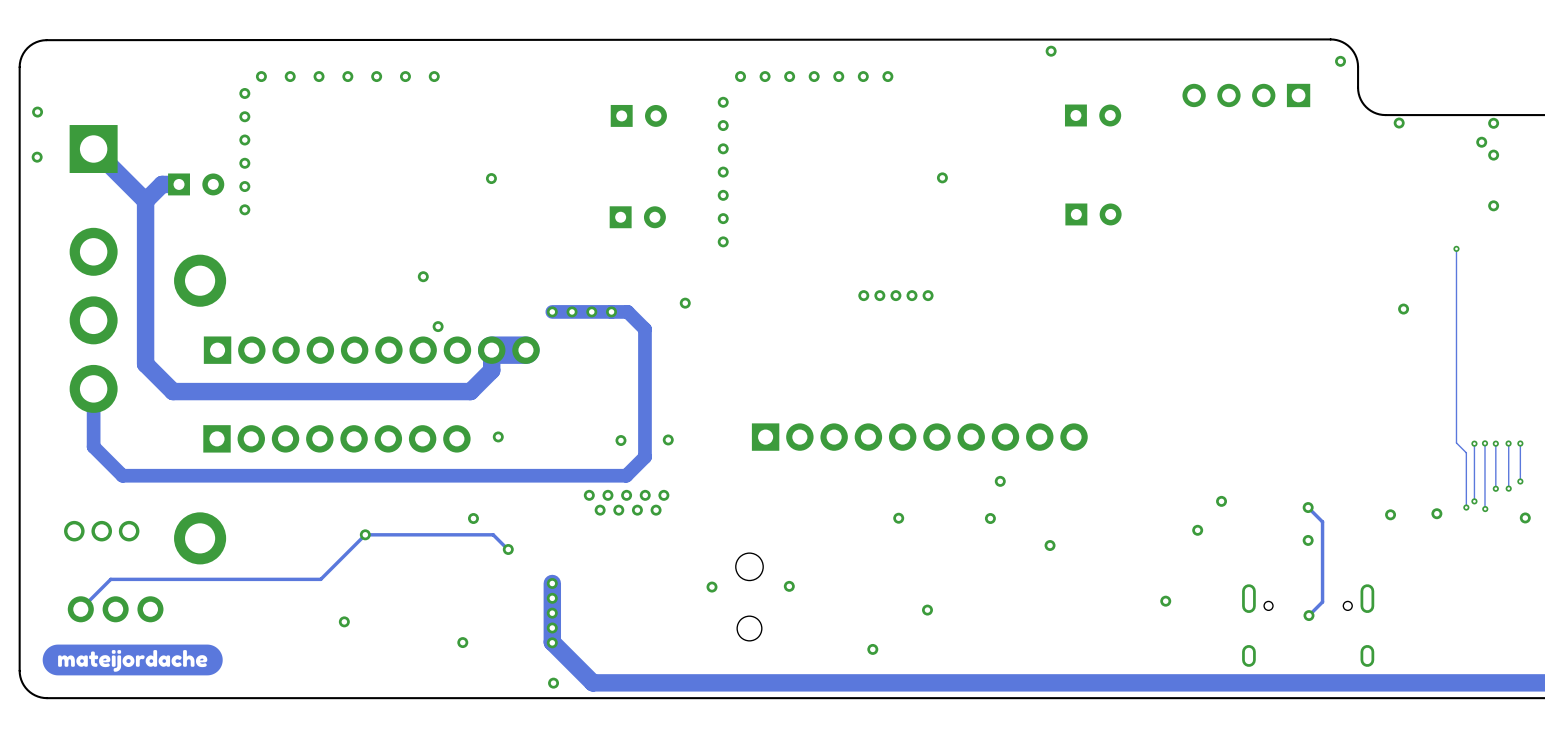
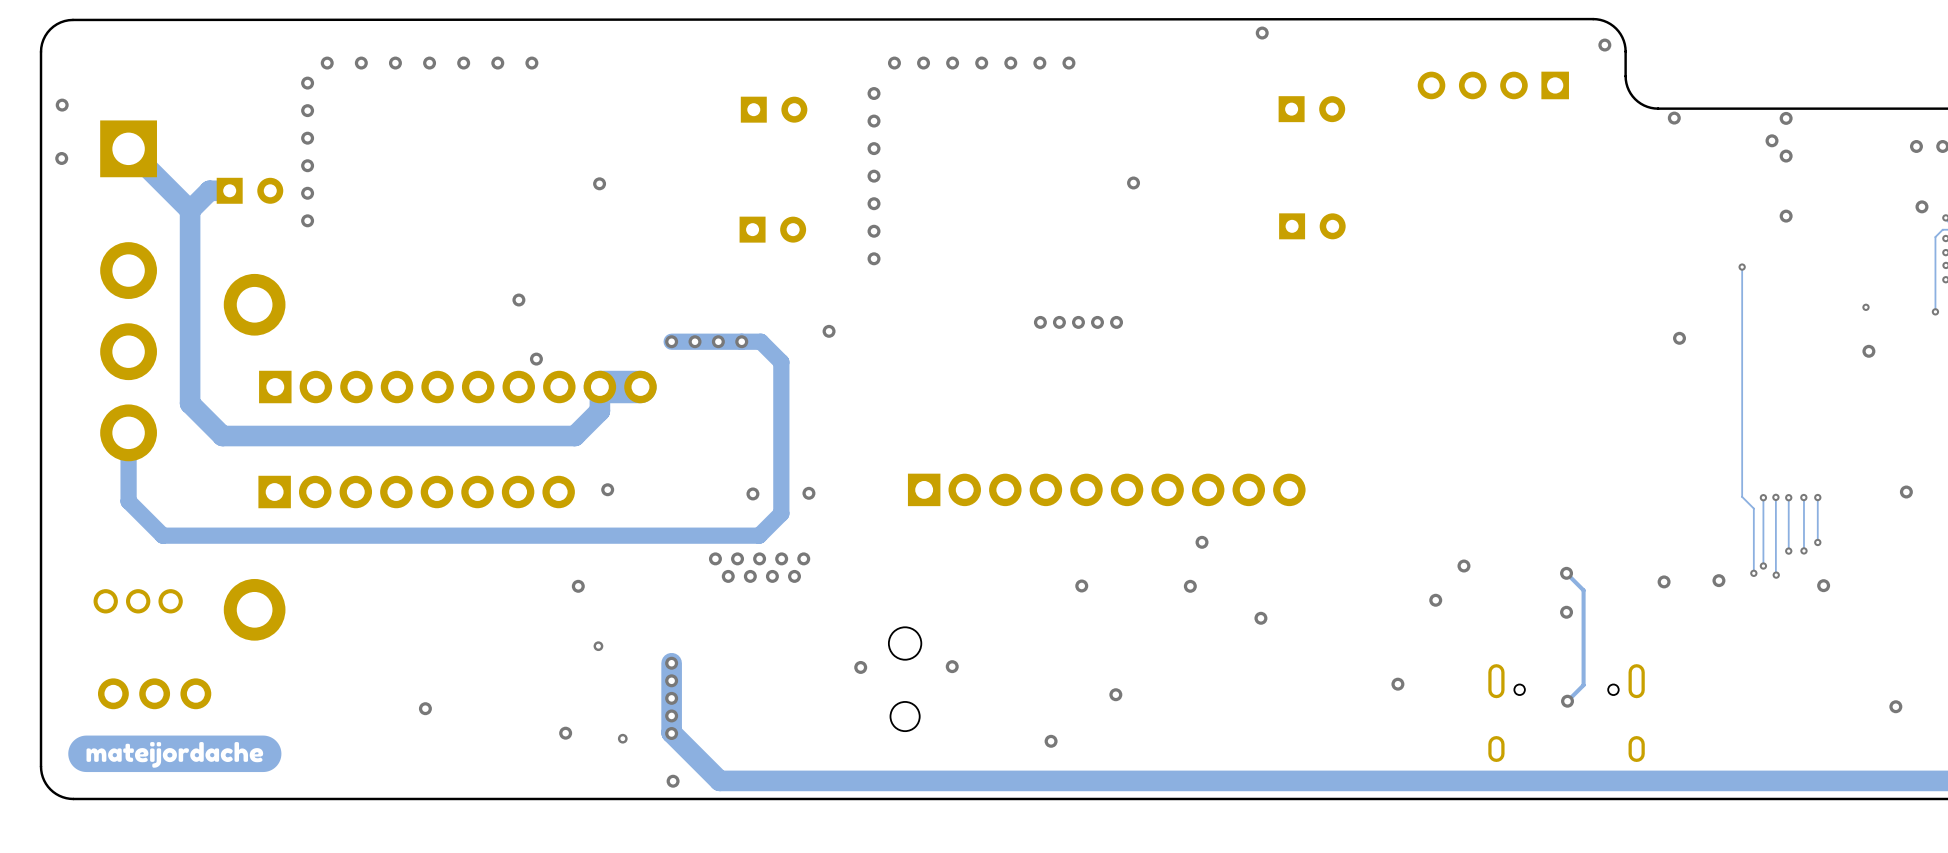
via: (365, 534) -> none
track: (508, 549) (493, 534) (365, 534) (320, 579) (110, 579) (80, 609) -> none
via: (508, 549) -> none
via: none -> (598, 646)
via: none -> (622, 738)

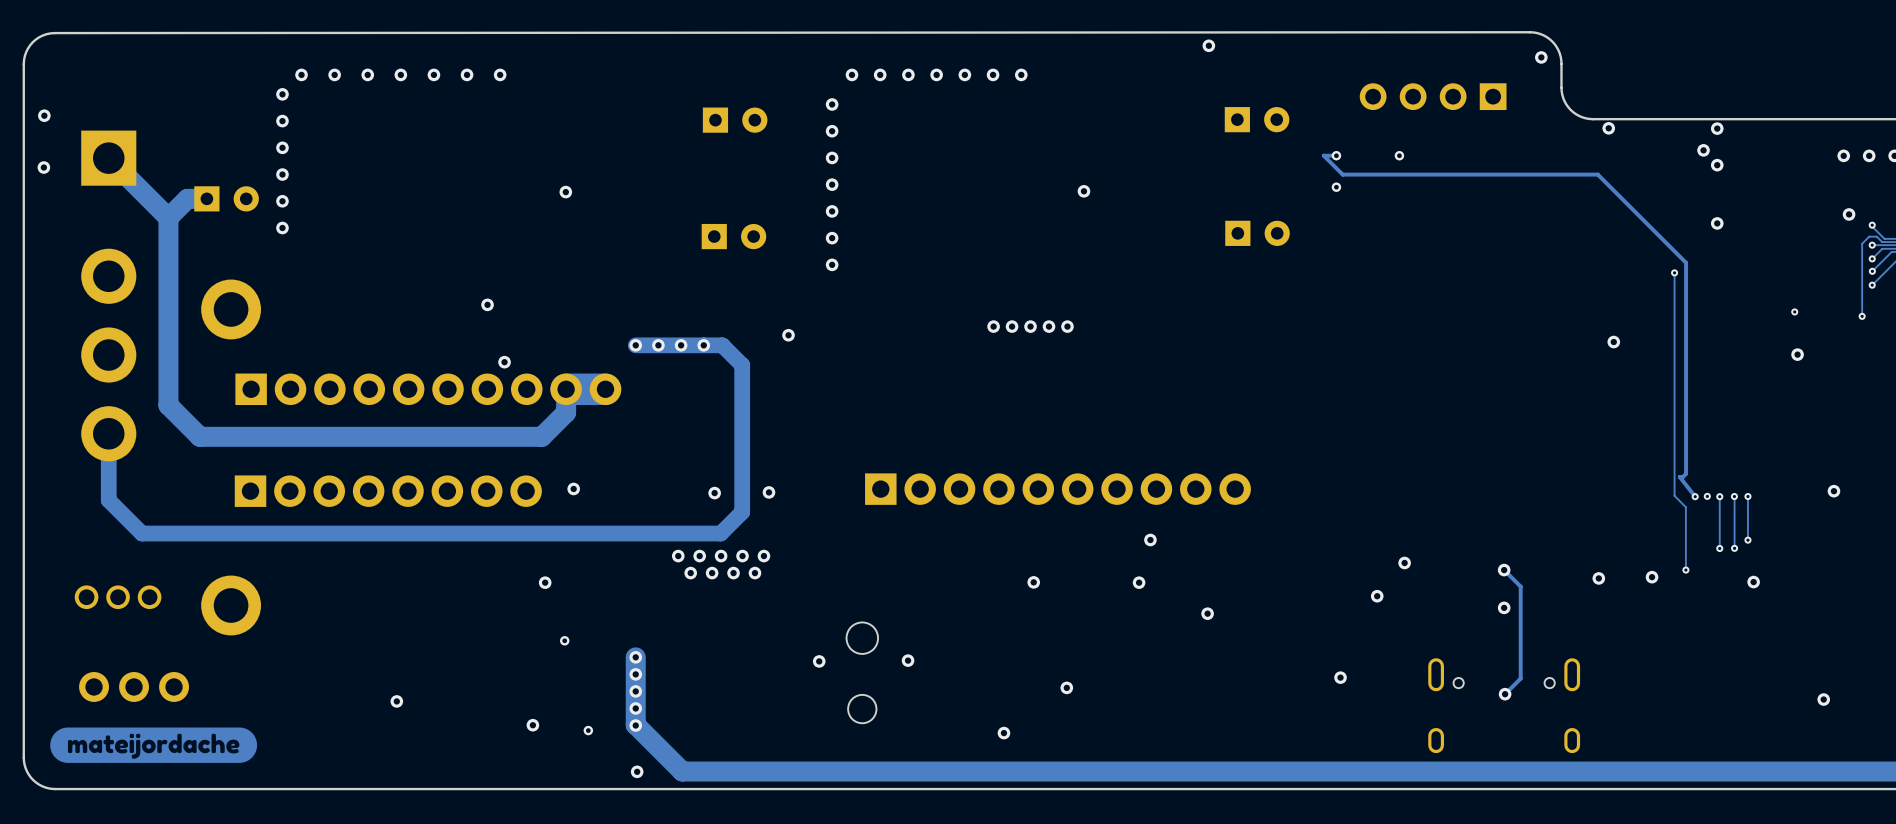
via: none -> (1336, 155)
via: none -> (1399, 155)
via: none -> (1336, 187)
track: (1763, 497) (1763, 566) -> (1695, 496) (1679, 477) (1686, 473) (1686, 262) (1597, 174) (1342, 174) (1323, 155) (1336, 155)
track: (1775, 497) (1776, 575) -> none
via: (1763, 566) -> none
via: (1776, 575) -> none

